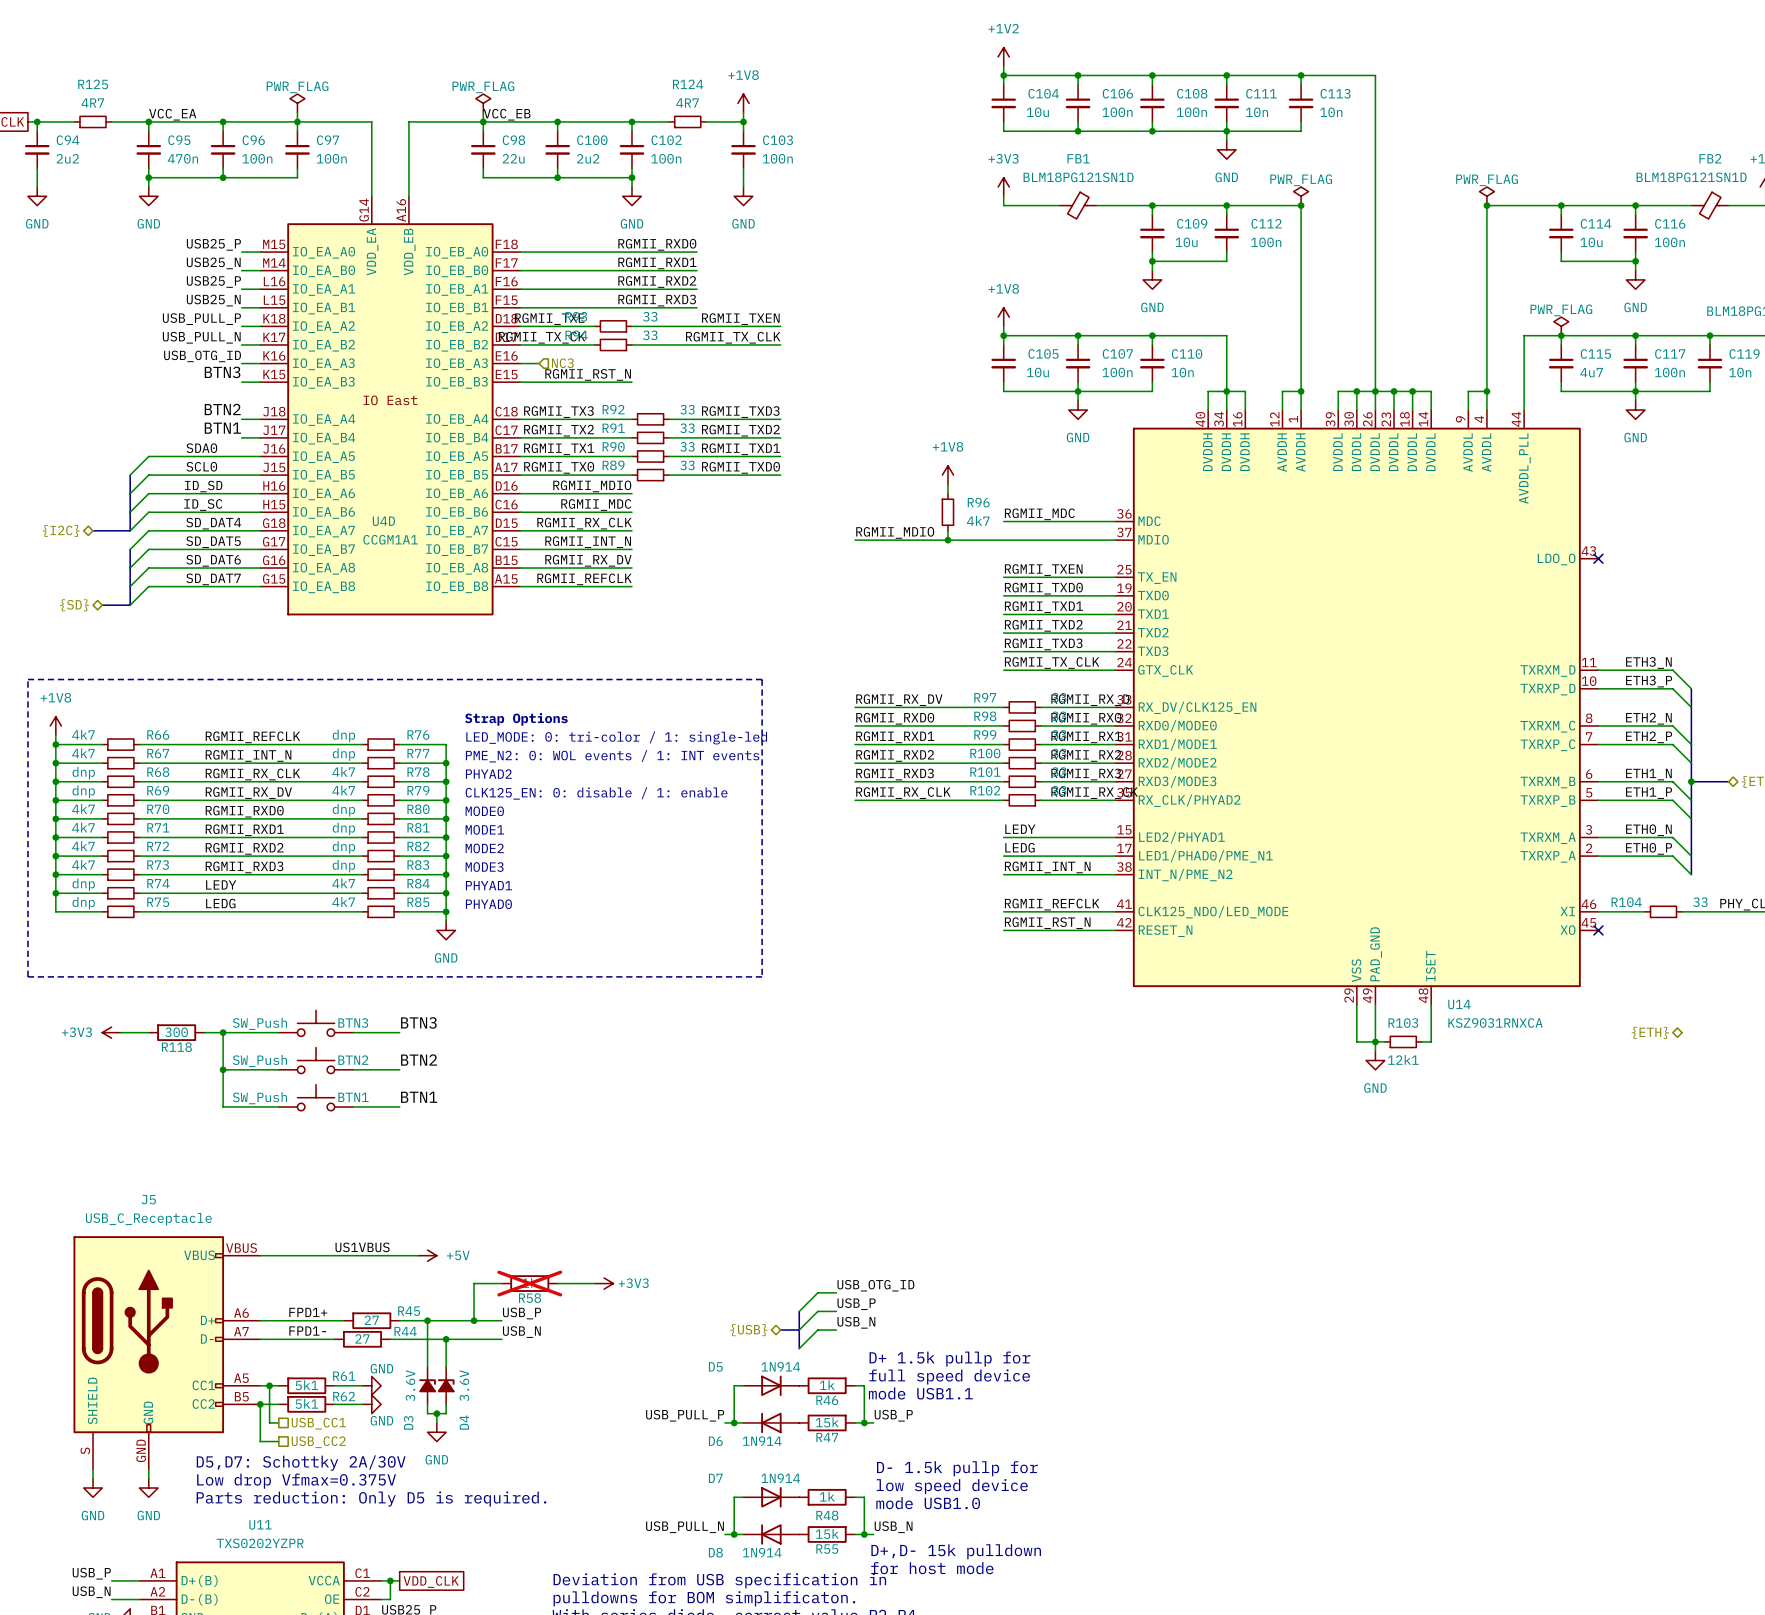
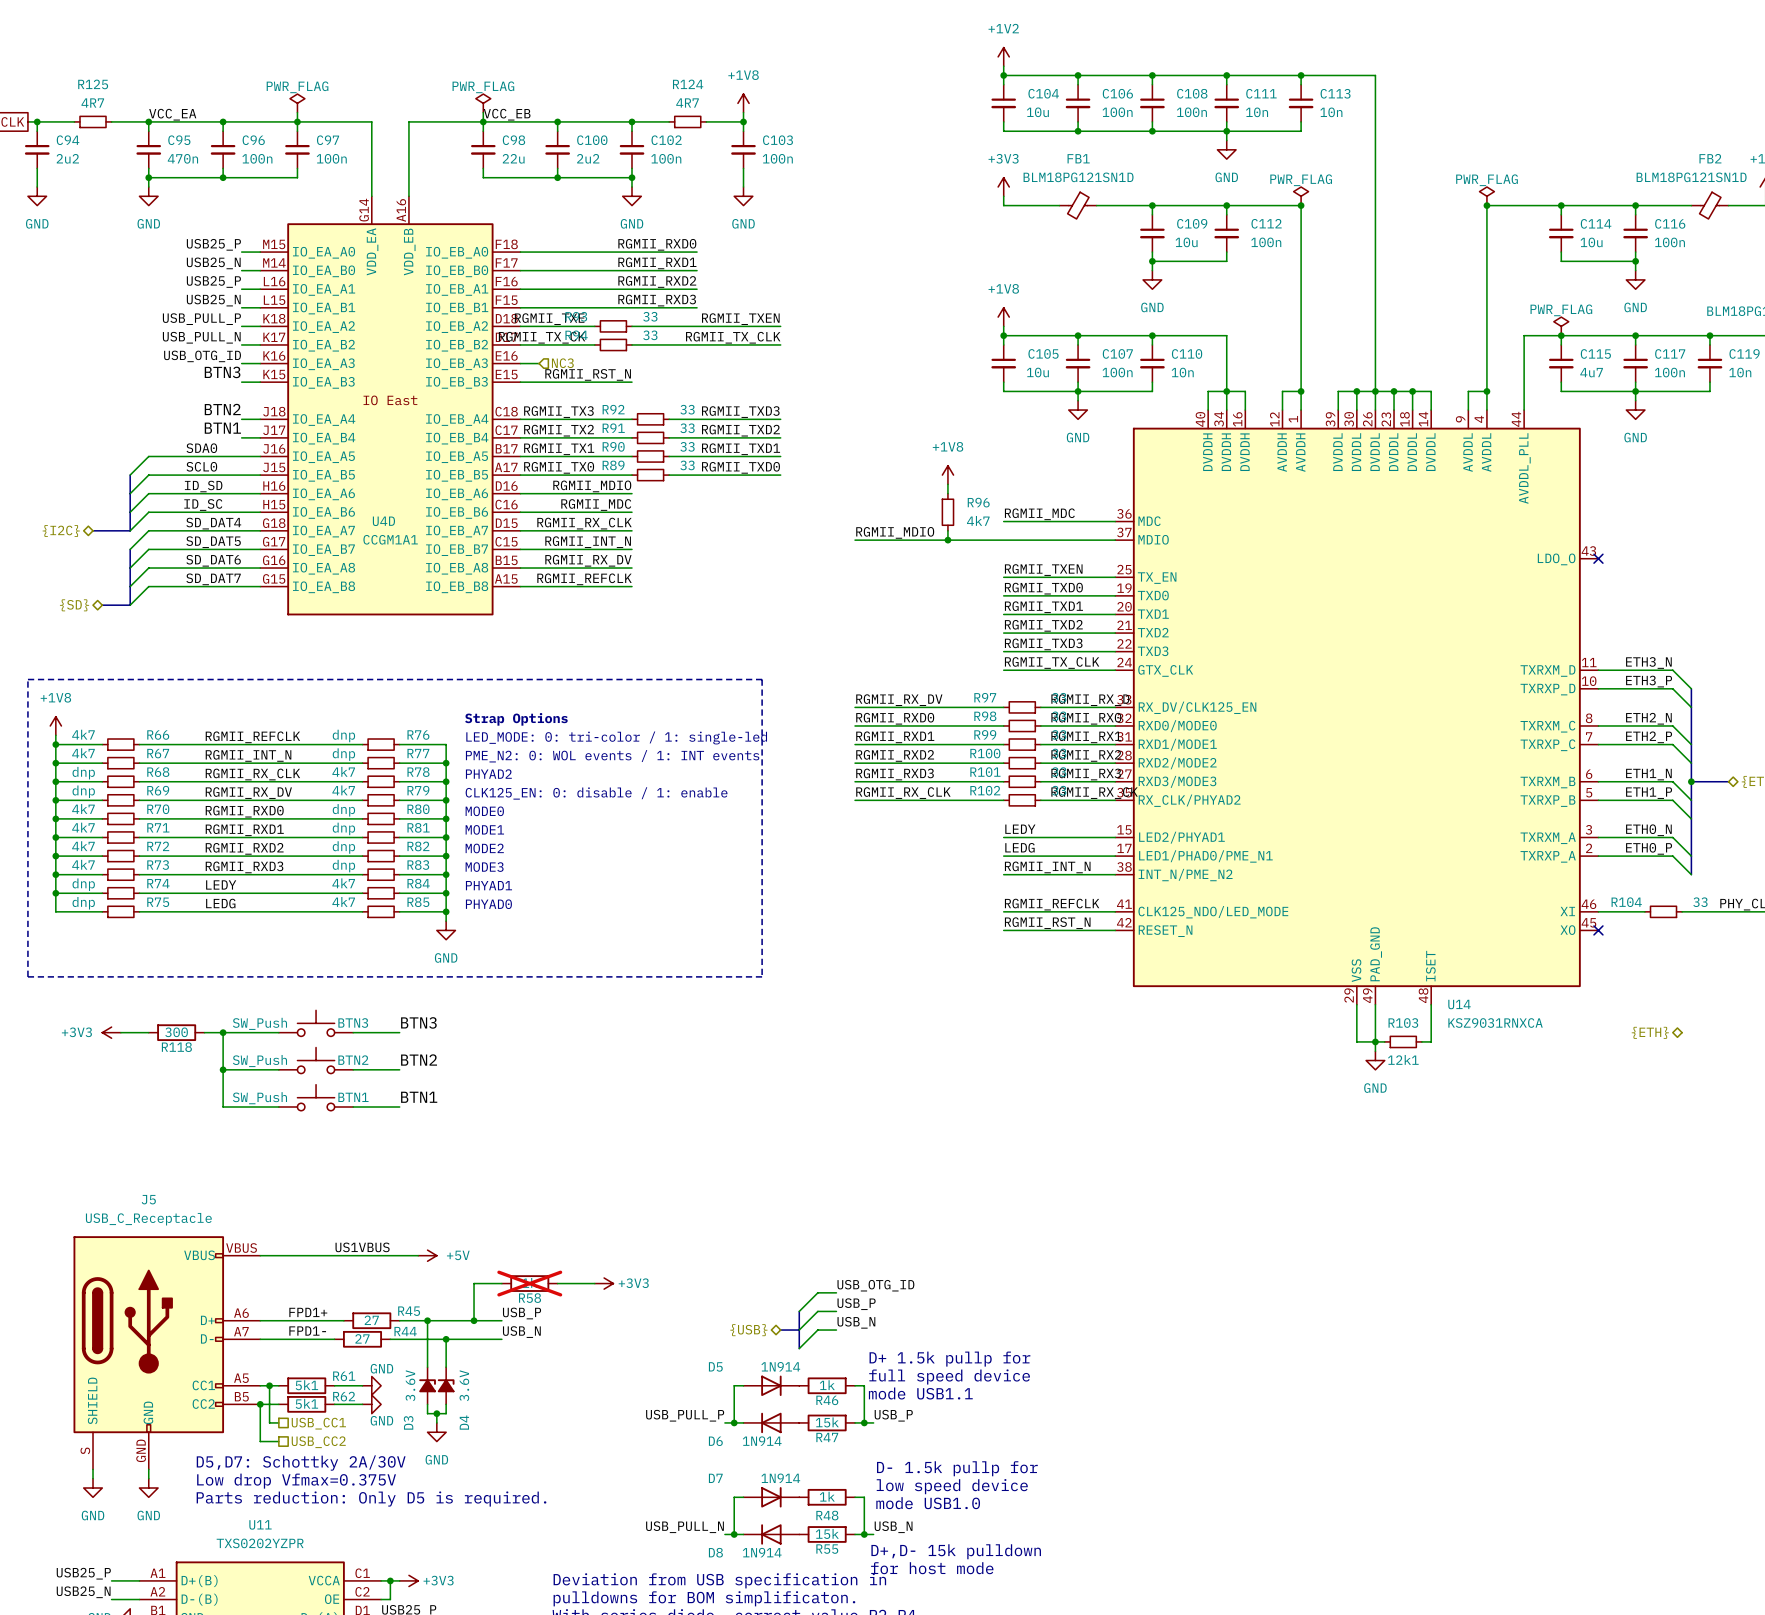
label: USB_P (91, 1573) -> USB25_P (83, 1573)
power symbol: none -> +3V3 (408, 1580)
global label: VDD_CLK (431, 1581) -> none
label: USB_N (91, 1592) -> USB25_N (83, 1592)

